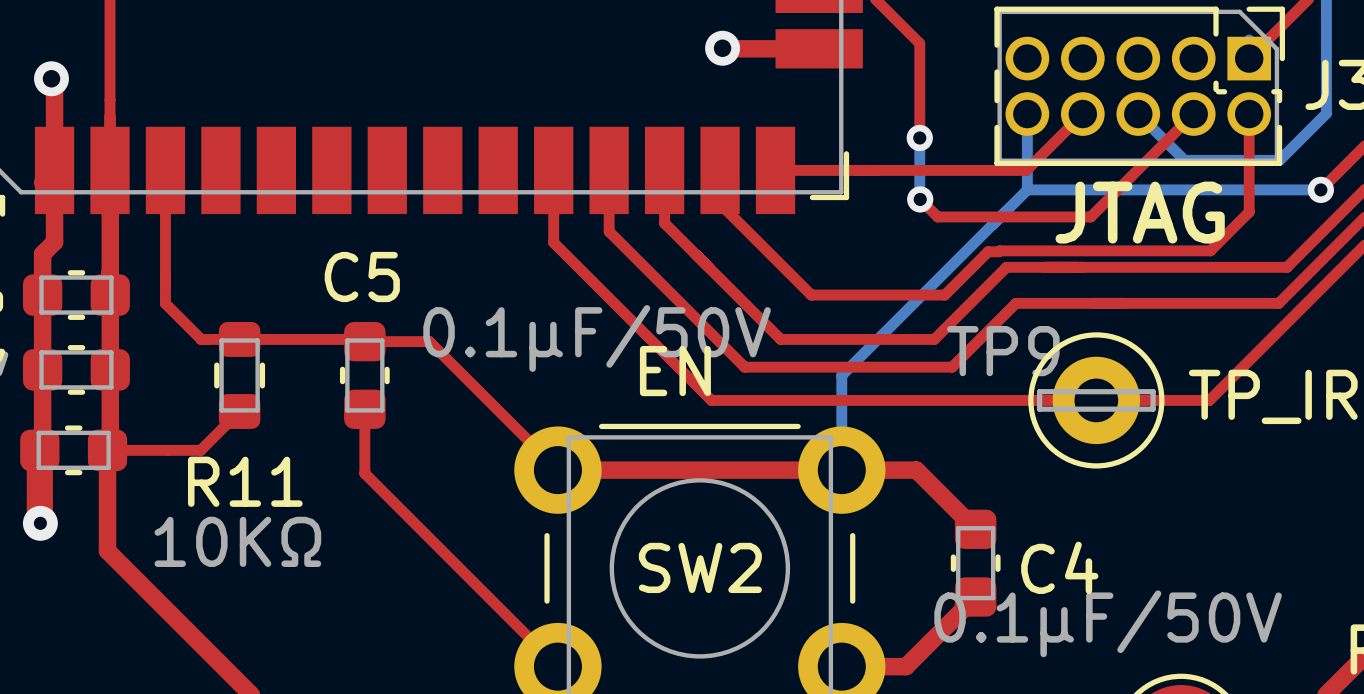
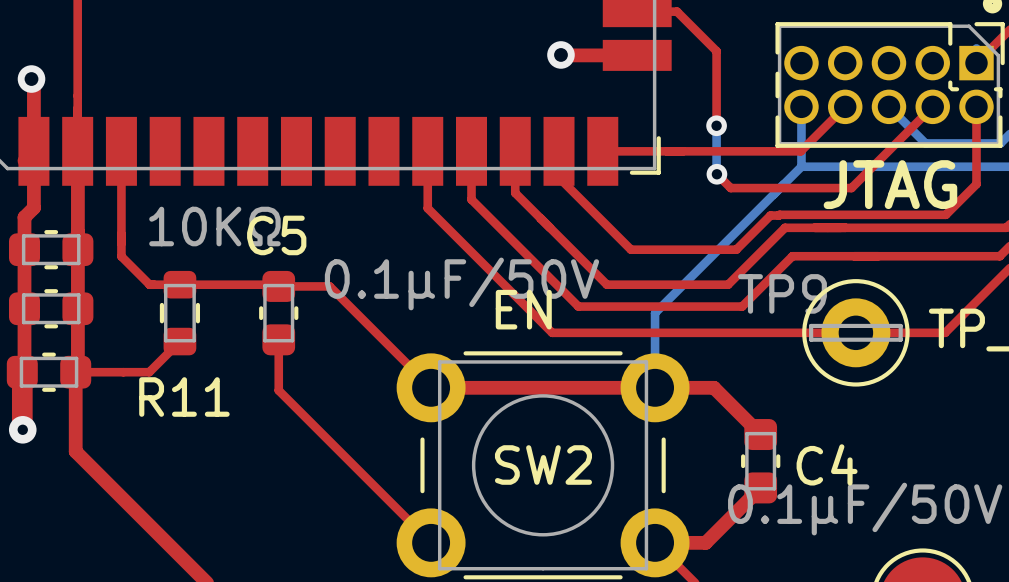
R11 value position: 10KΩ (237, 541) -> 10KΩ (214, 226)

